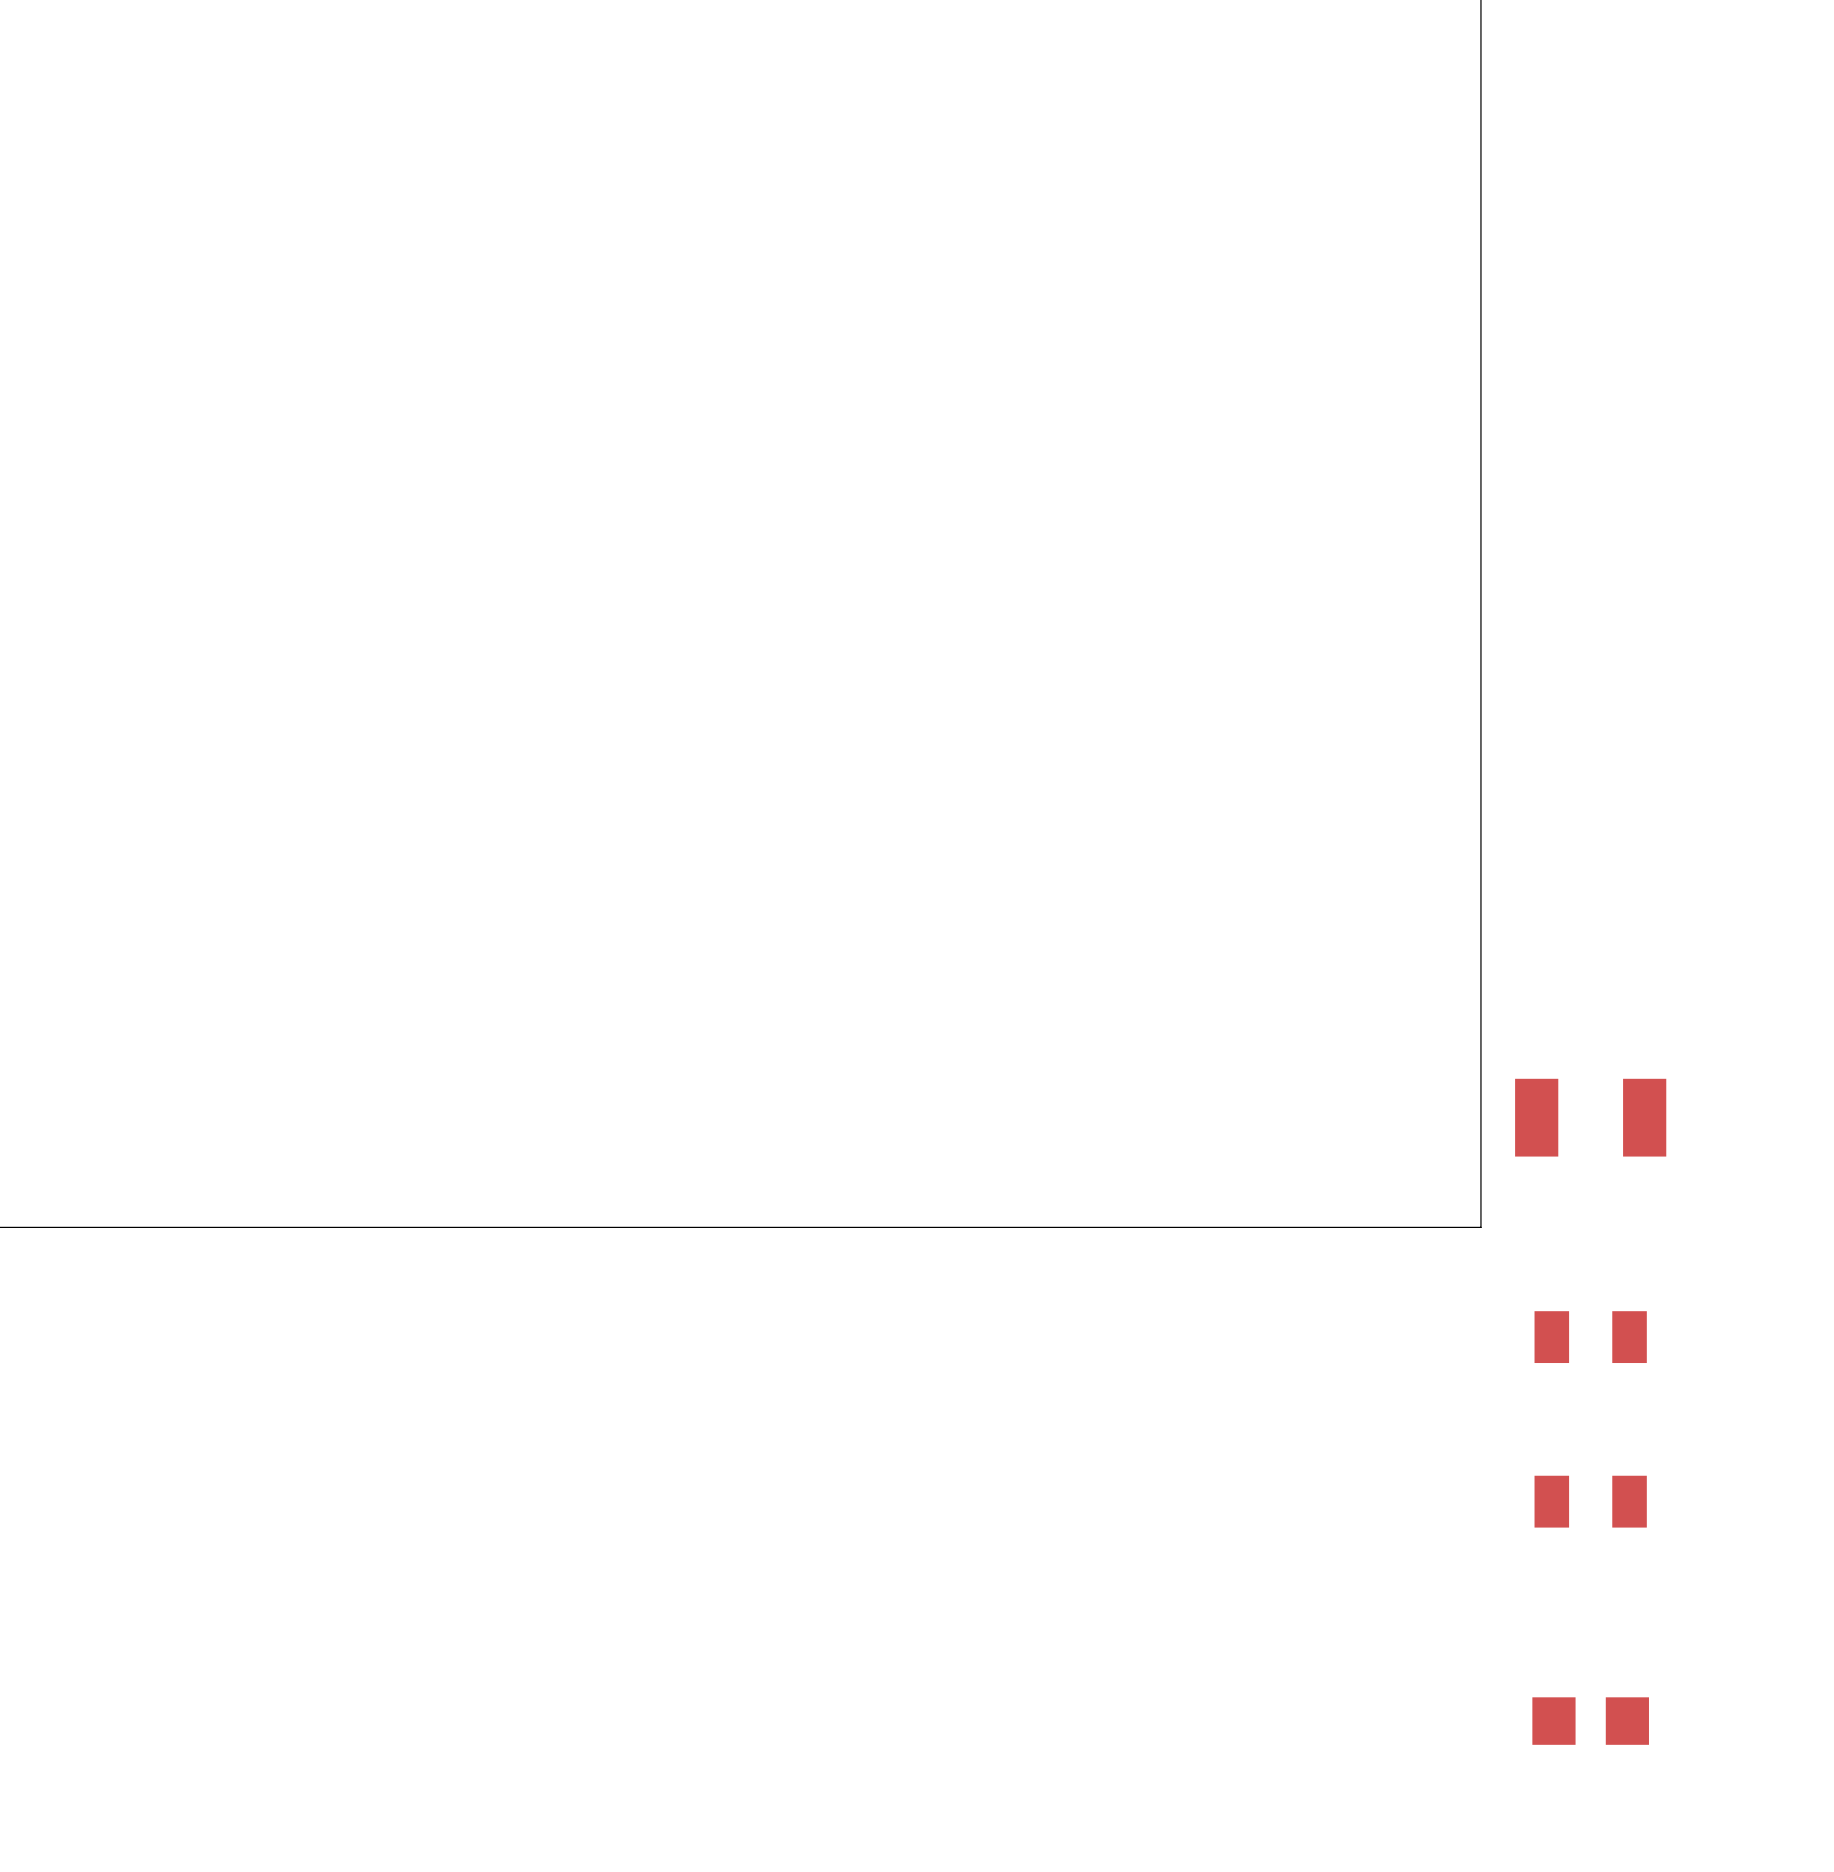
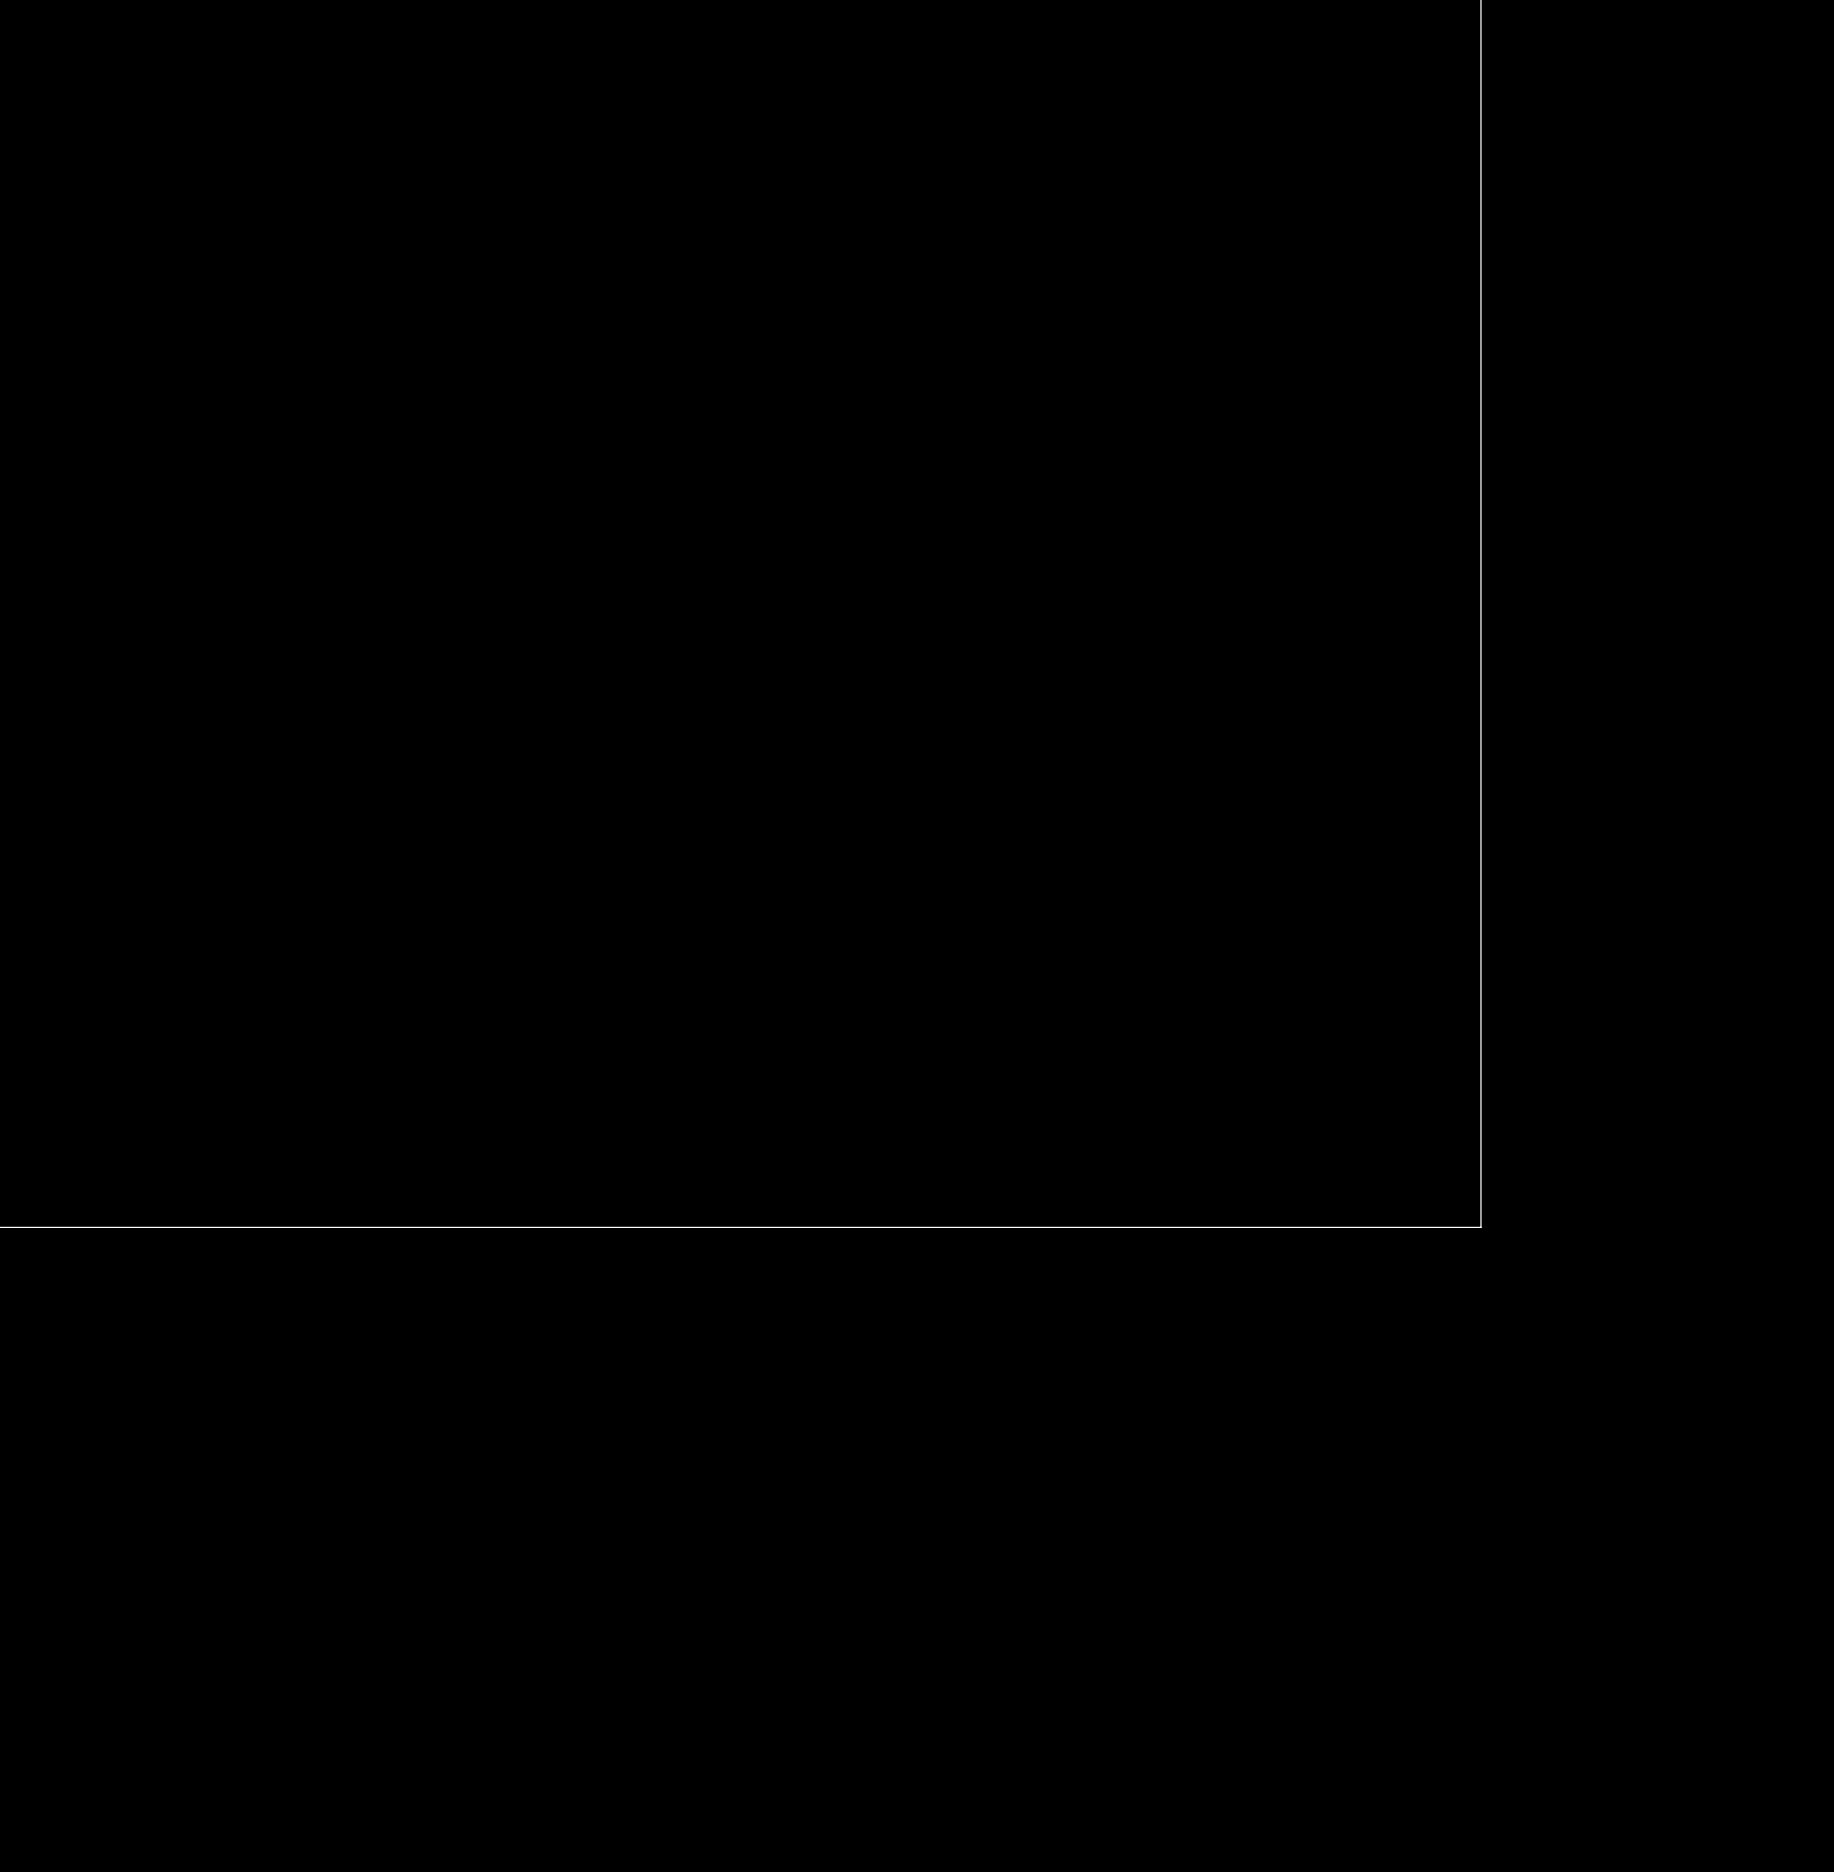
part: (1590, 1117) -> none
part: (1590, 1337) -> none
part: (1590, 1501) -> none
part: (1590, 1721) -> none

